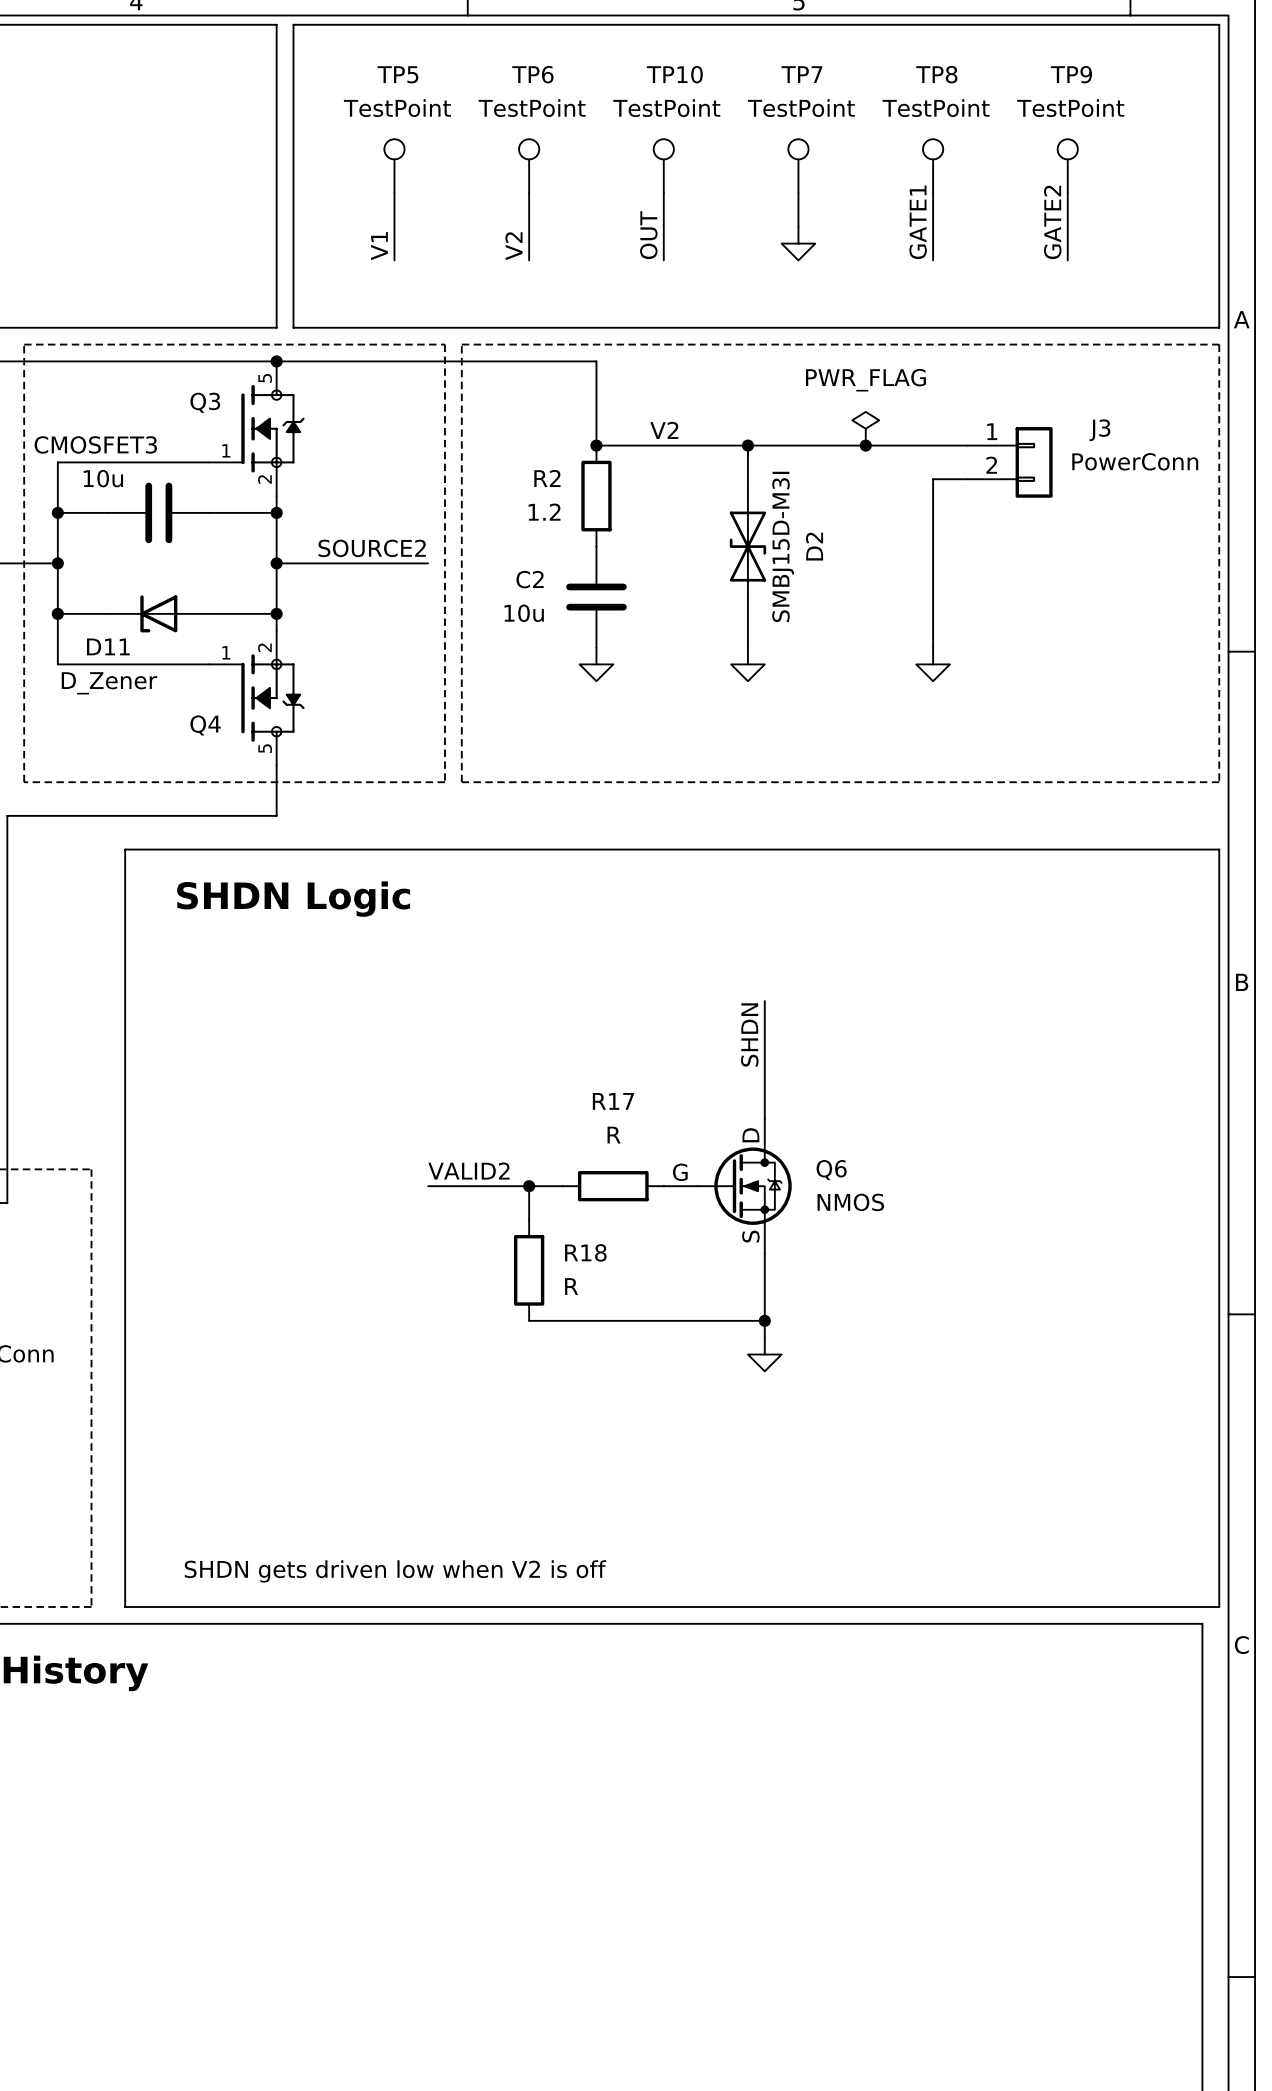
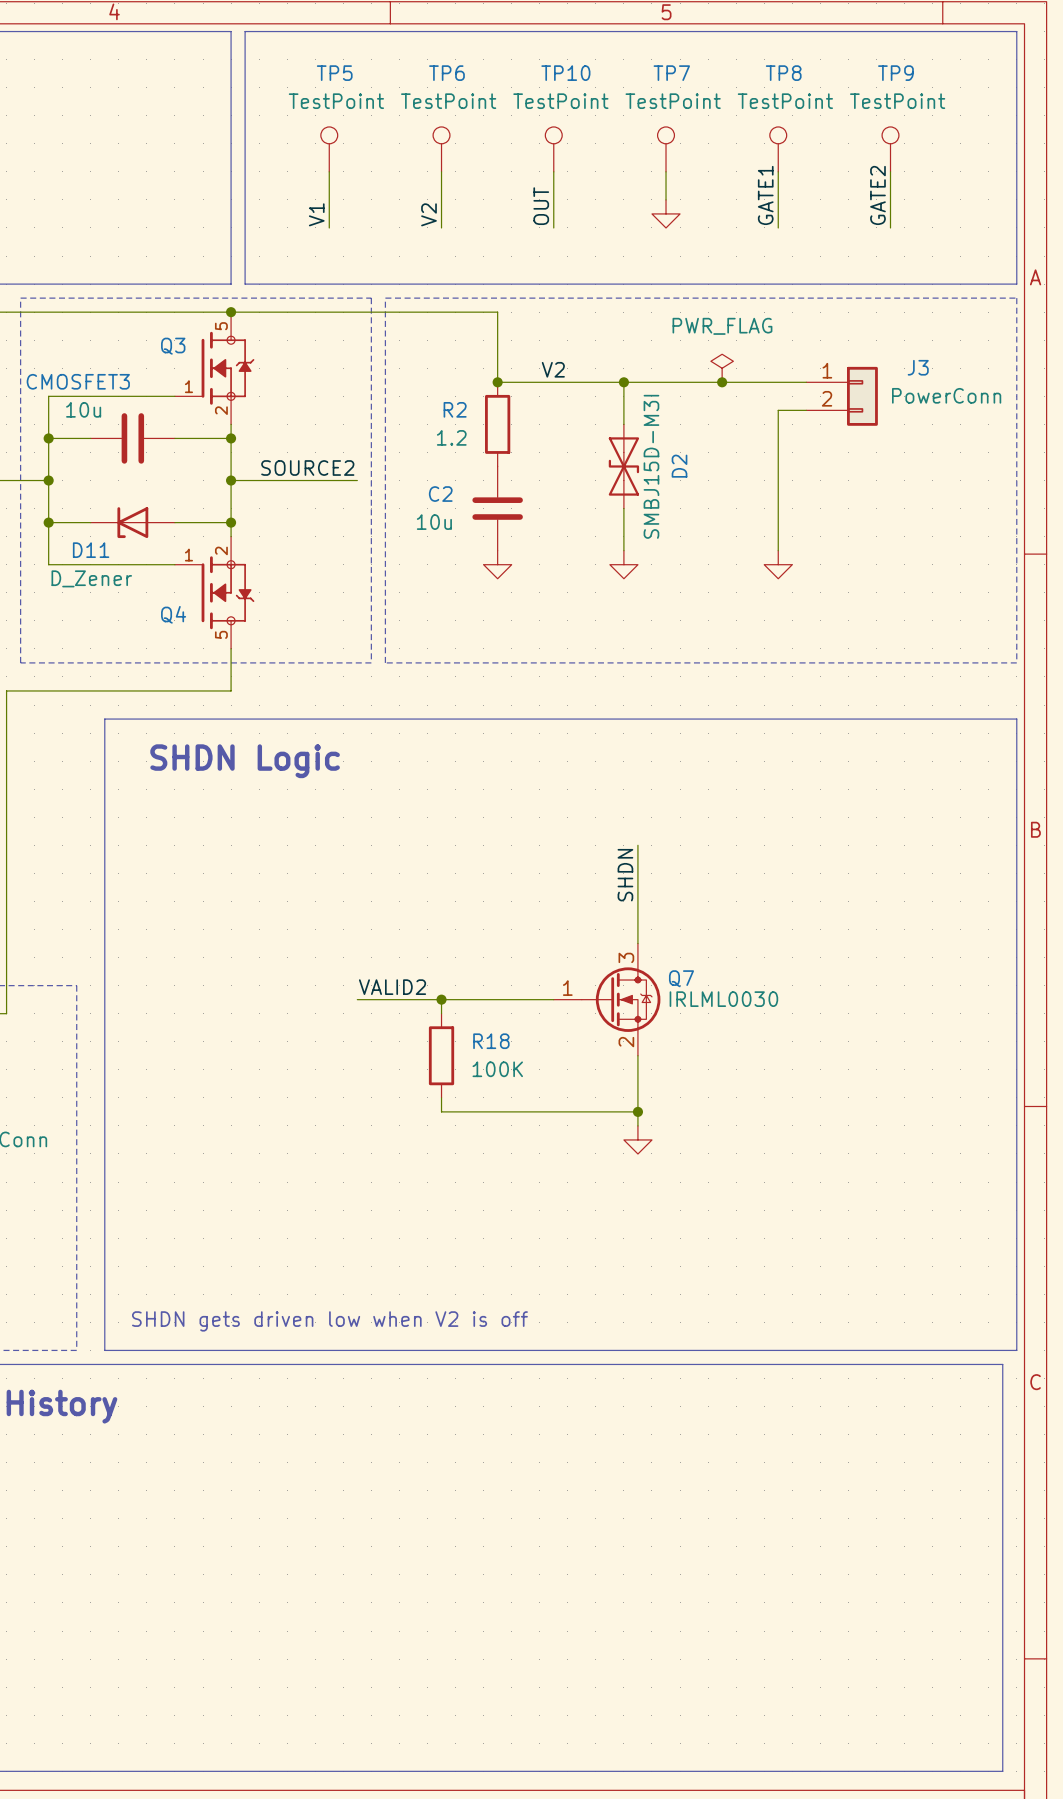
Q6 pin name: D (750, 1135) -> none
Q6 pin number: none -> 3 (626, 957)
Q6 name: Q6 (831, 1170) -> Q7 (681, 978)
Q6 pin name: G (680, 1172) -> none
Q6 pin number: none -> 1 (567, 988)
wire: none -> (469, 999) (553, 999)
R17: R (613, 1186) -> none
Q6 value: NMOS (850, 1202) -> IRLML0030 (723, 999)
Q6 pin name: S (750, 1236) -> none
Q6 pin number: none -> 2 (626, 1042)
R18 position: (529, 1270) -> (441, 1055)
R18 value: R (571, 1286) -> 100K (497, 1069)

